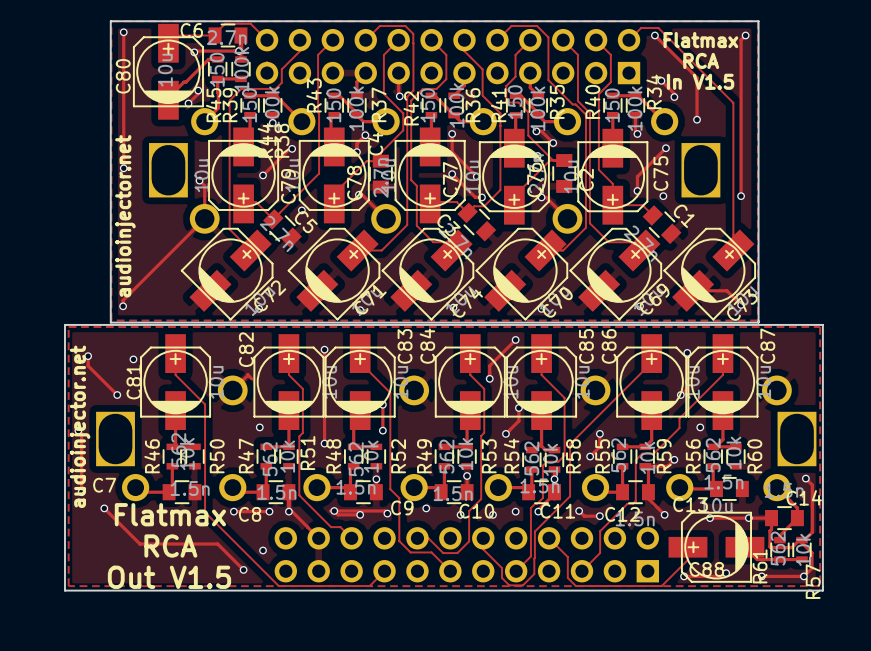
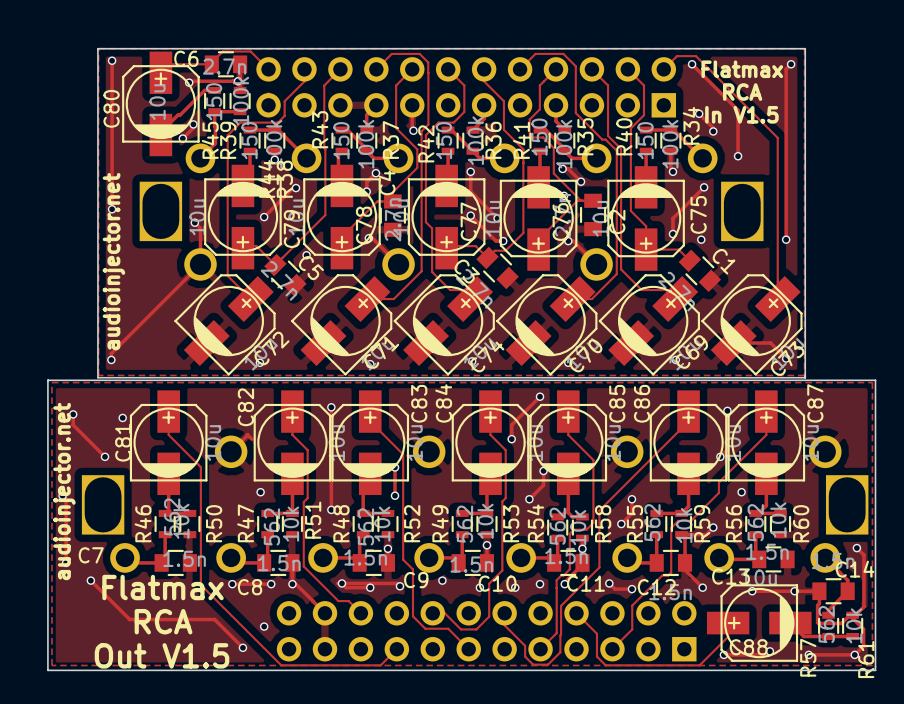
R61 name position: R61 (760, 566) -> R61 (866, 659)
R57 name position: R57 (813, 581) -> R57 (808, 657)

